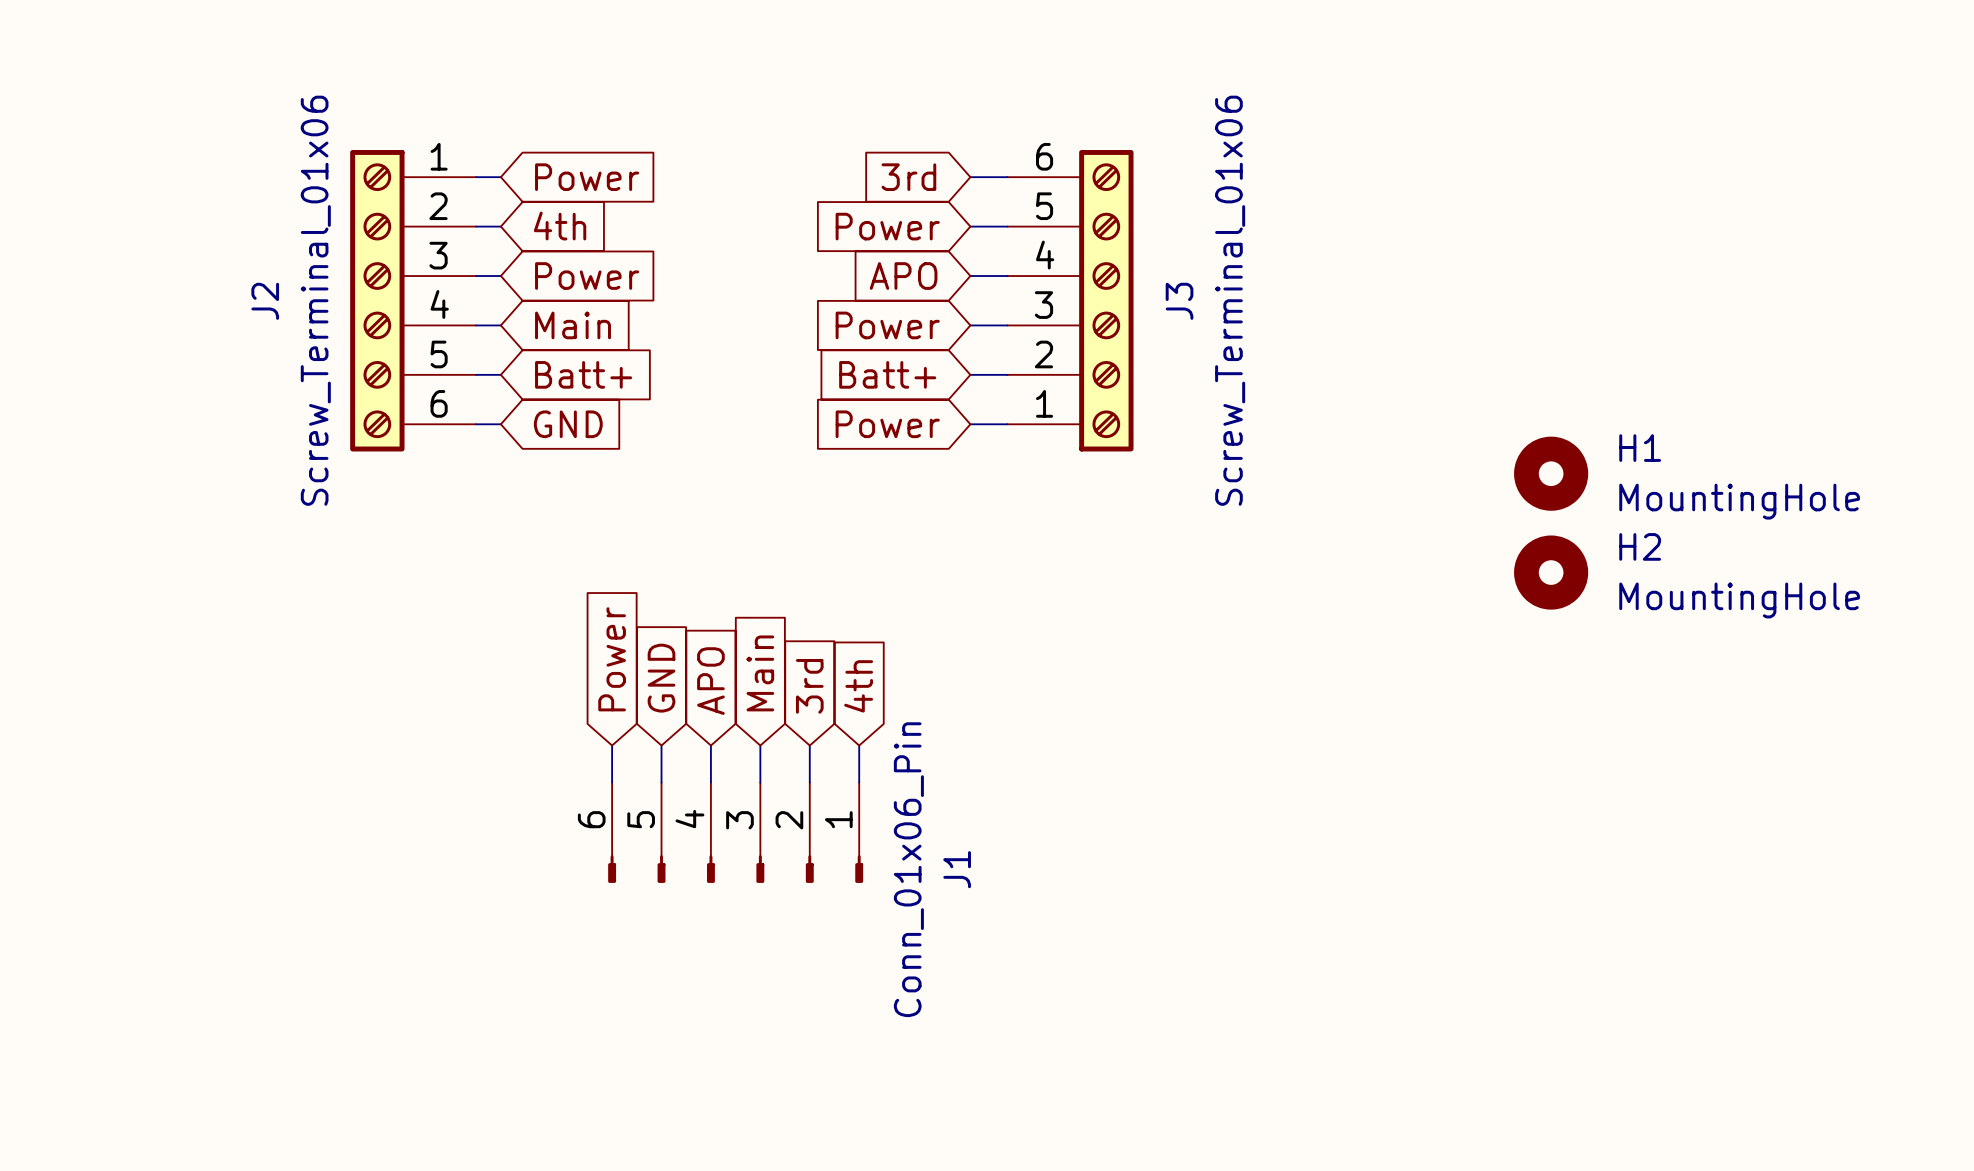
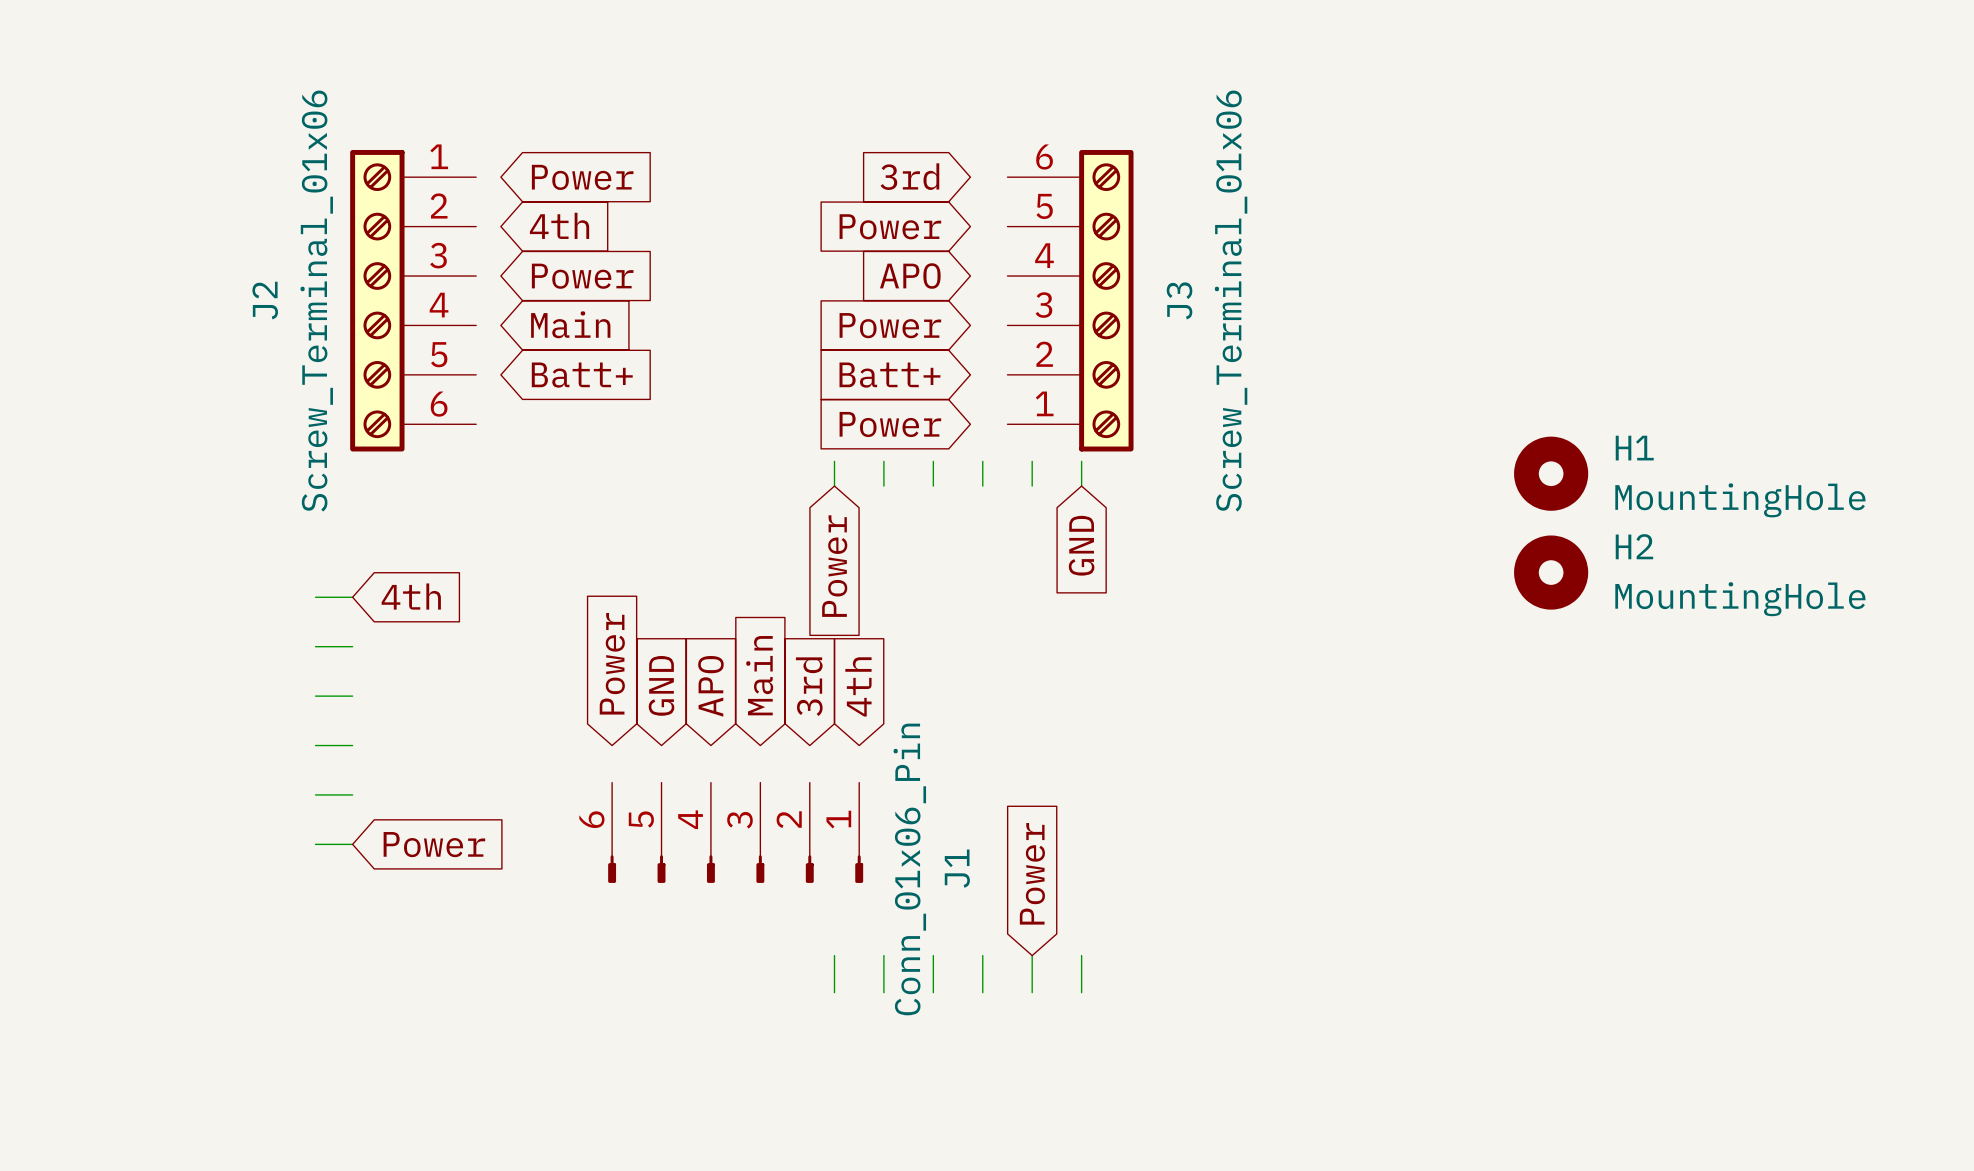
wire: (476, 177) (500, 177) -> none
wire: (970, 177) (1007, 177) -> none
wire: (476, 226) (500, 226) -> none
wire: (970, 226) (1007, 226) -> none
wire: (476, 276) (500, 276) -> none
wire: (970, 276) (1007, 276) -> none
wire: (476, 325) (500, 325) -> none
wire: (970, 325) (1007, 325) -> none
wire: (476, 374) (500, 374) -> none
wire: (970, 374) (1007, 374) -> none
wire: (476, 424) (500, 424) -> none
global label: GND (568, 424) -> none
wire: (970, 424) (1007, 424) -> none
wire: none -> (834, 461) (834, 486)
wire: none -> (883, 461) (883, 486)
wire: none -> (933, 461) (933, 486)
wire: none -> (982, 461) (982, 486)
wire: none -> (1032, 461) (1032, 486)
wire: none -> (1081, 461) (1081, 486)
global label: none -> GND (1081, 545)
global label: none -> Power (834, 566)
global label: none -> 4th (411, 596)
wire: none -> (315, 597) (352, 597)
wire: none -> (315, 646) (352, 646)
wire: none -> (315, 696) (352, 696)
wire: none -> (315, 745) (352, 745)
wire: (612, 745) (612, 782) -> (834, 955) (834, 992)
wire: (661, 745) (661, 782) -> (883, 955) (883, 992)
wire: (710, 745) (710, 782) -> (933, 955) (933, 992)
wire: (760, 745) (760, 782) -> (982, 955) (982, 992)
wire: (809, 745) (809, 782) -> (1032, 955) (1032, 992)
wire: (859, 745) (859, 782) -> (1081, 955) (1081, 992)
wire: none -> (315, 794) (352, 794)
wire: none -> (315, 844) (352, 844)
global label: none -> Power (434, 844)
global label: none -> Power (1032, 873)

